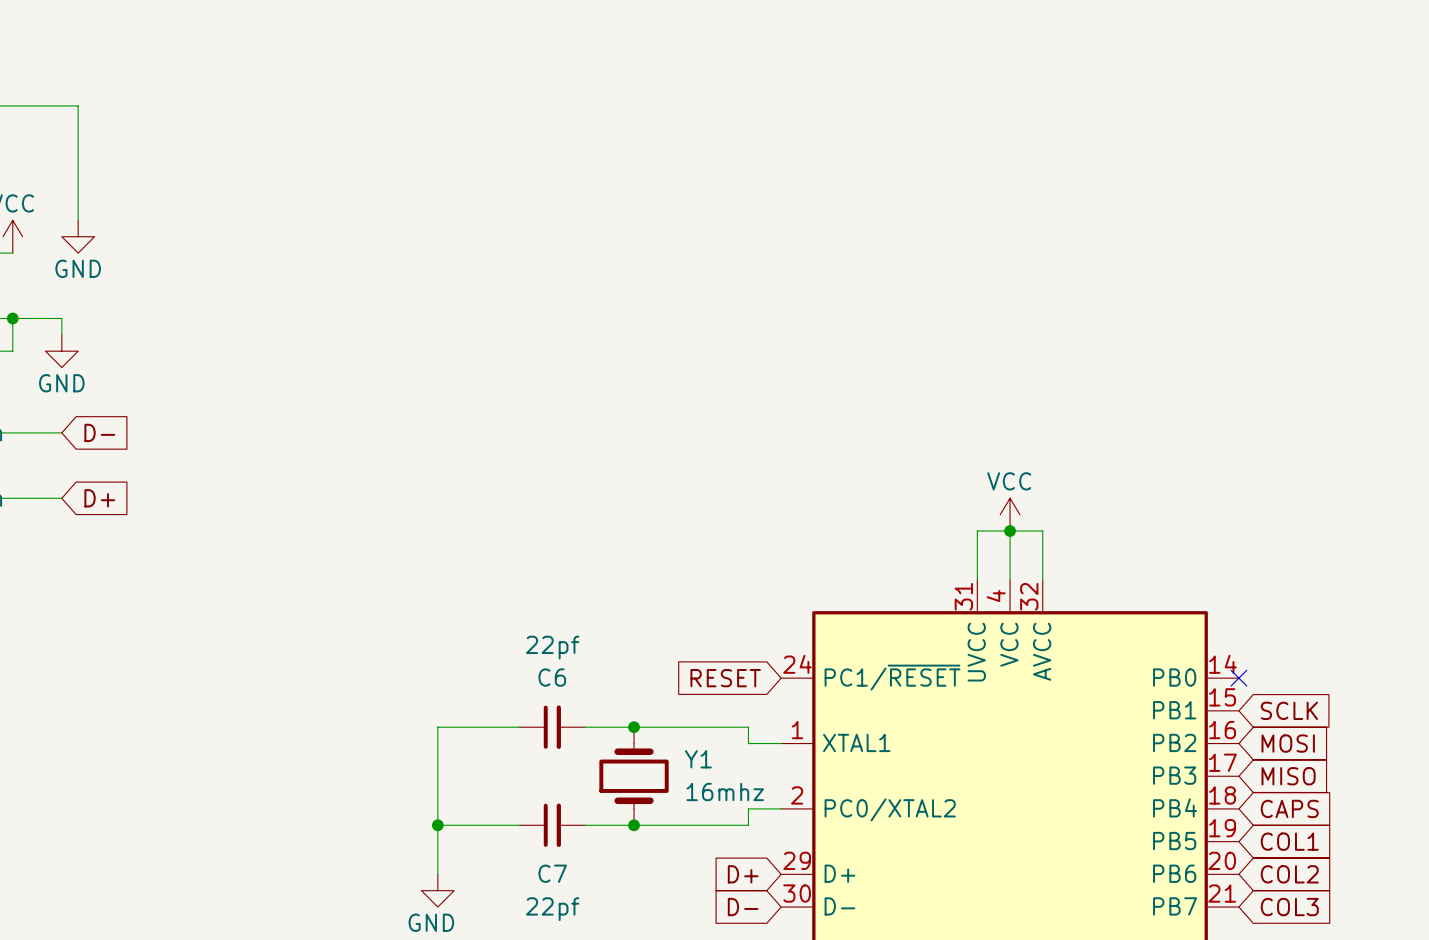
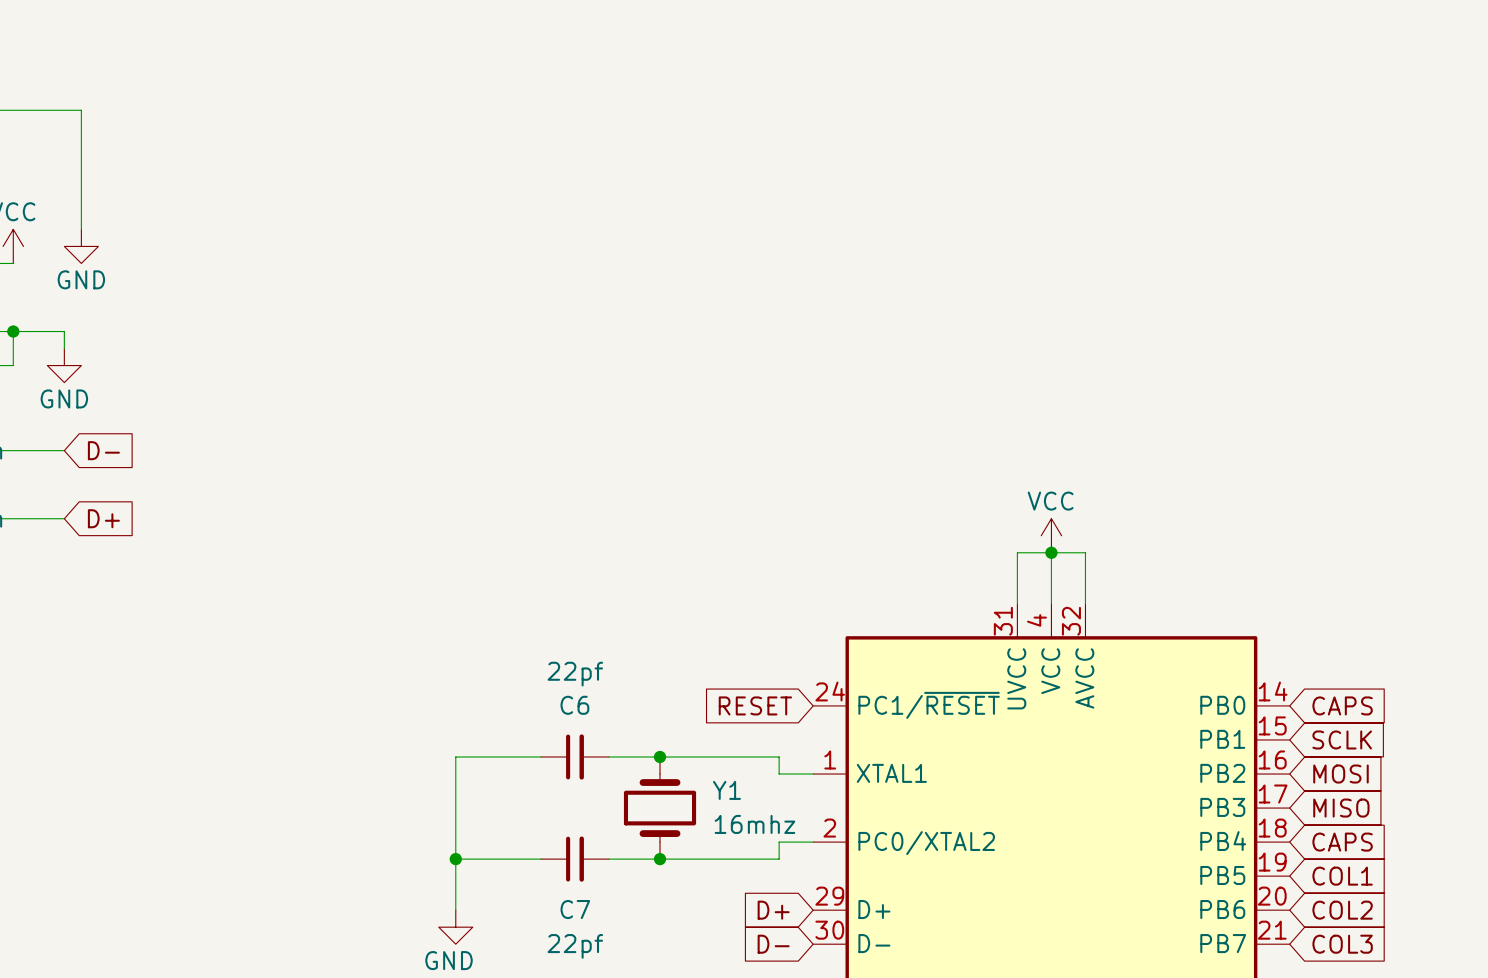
no-connect mark: (1238, 678) -> none
global label: none -> CAPS (1342, 705)

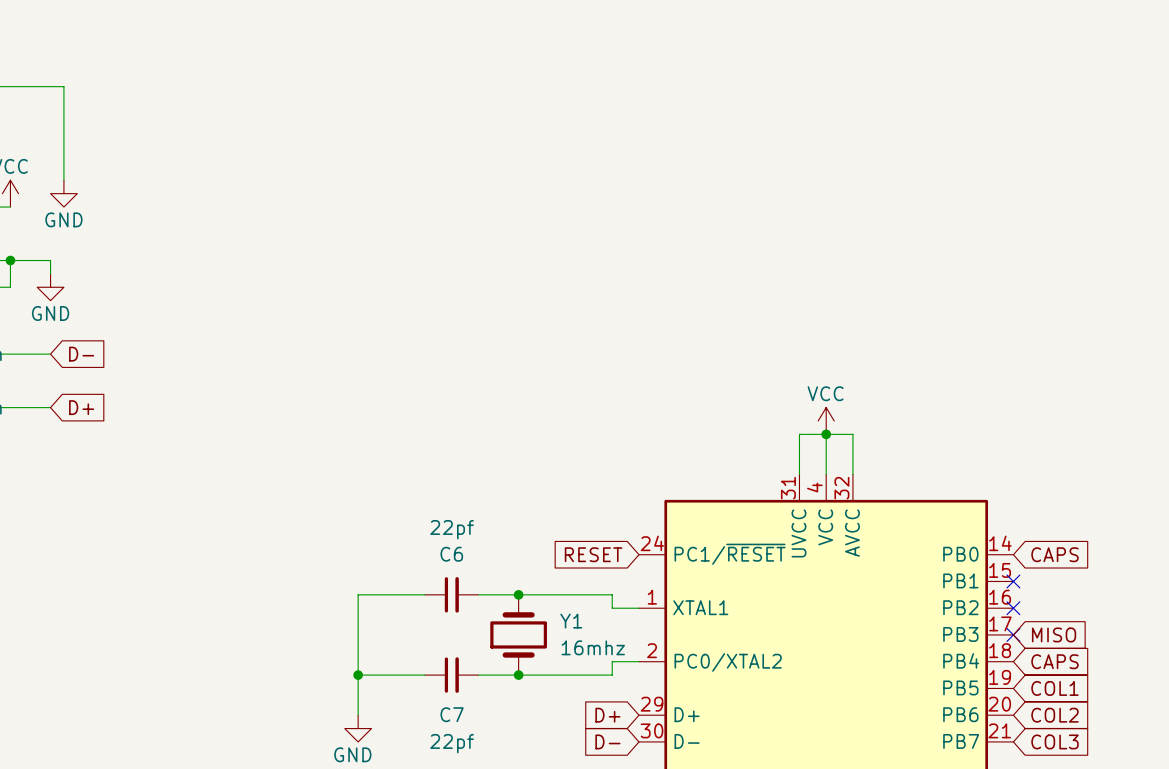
no-connect mark: none -> (1013, 581)
global label: SCLK (1342, 739) -> none
no-connect mark: none -> (1013, 608)
global label: MOSI (1340, 774) -> none
no-connect mark: none -> (1013, 634)

